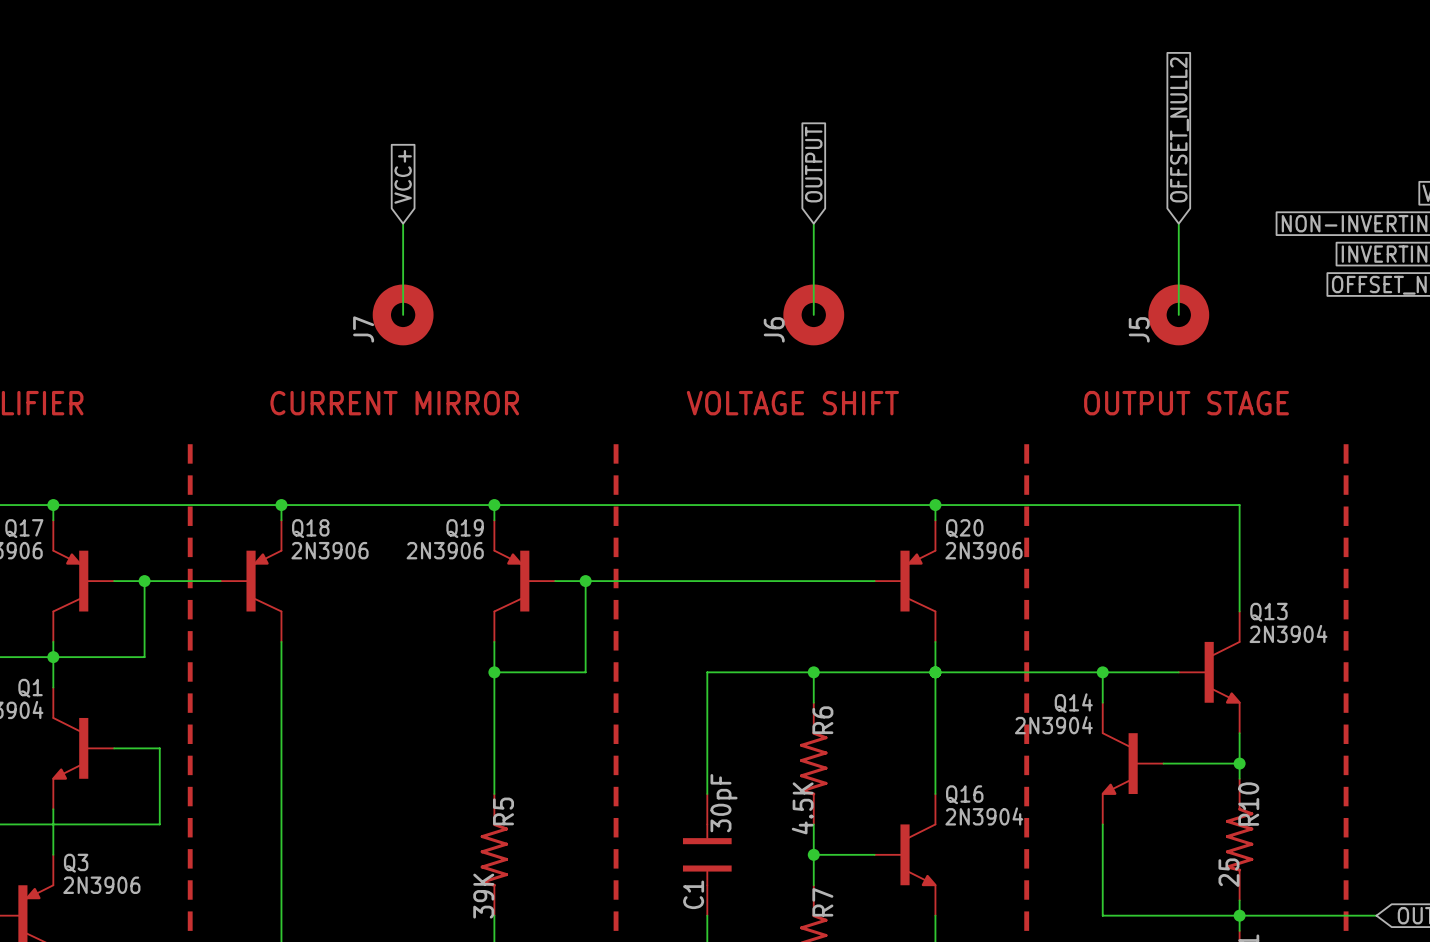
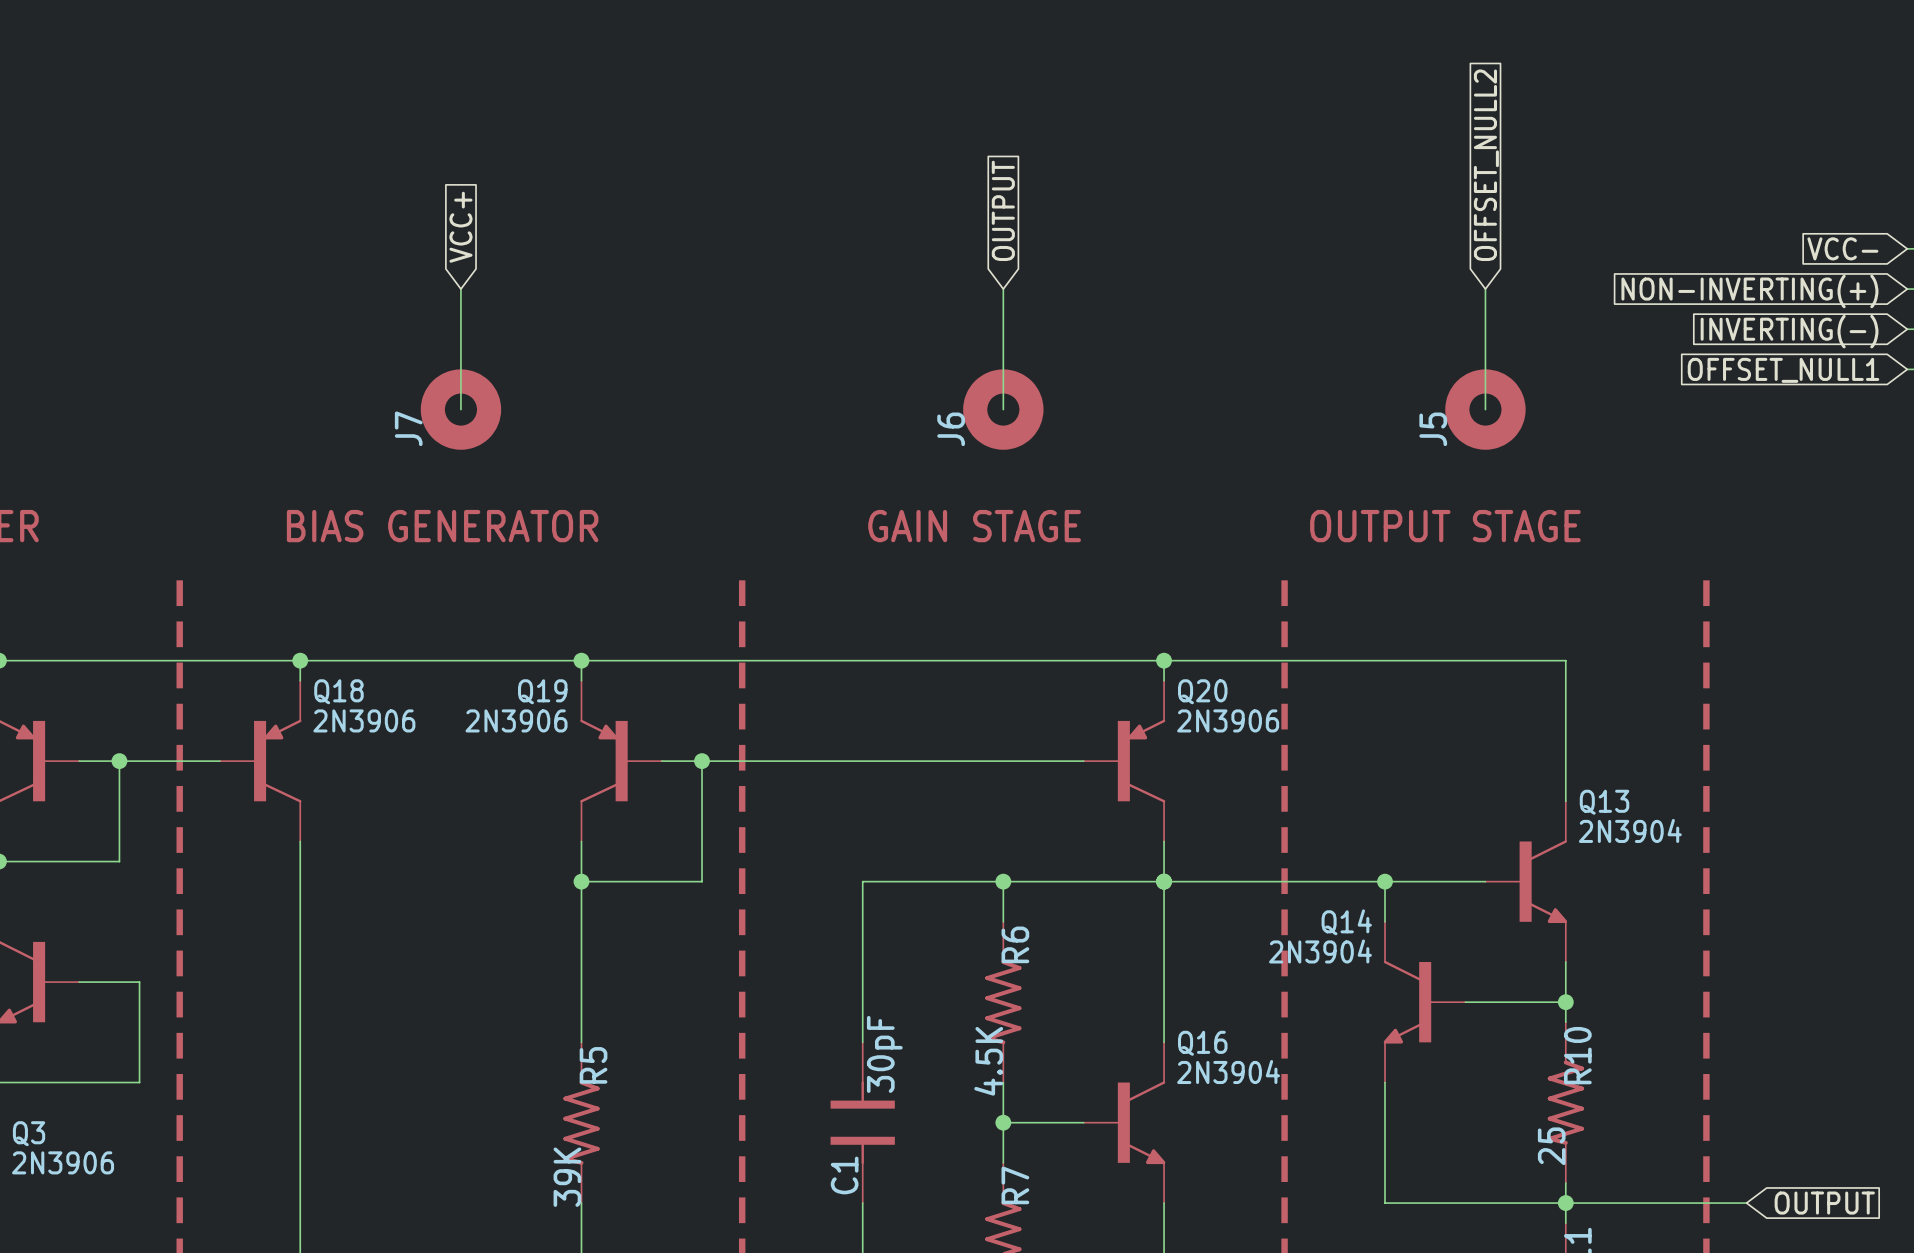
text: CURRENT MIRROR (394, 403) -> BIAS GENERATOR (442, 526)
text: none -> GAIN STAGE (974, 526)
text: VOLTAGE SHIFT (792, 403) -> none
text position: OUTPUT STAGE (1186, 403) -> OUTPUT STAGE (1445, 526)

